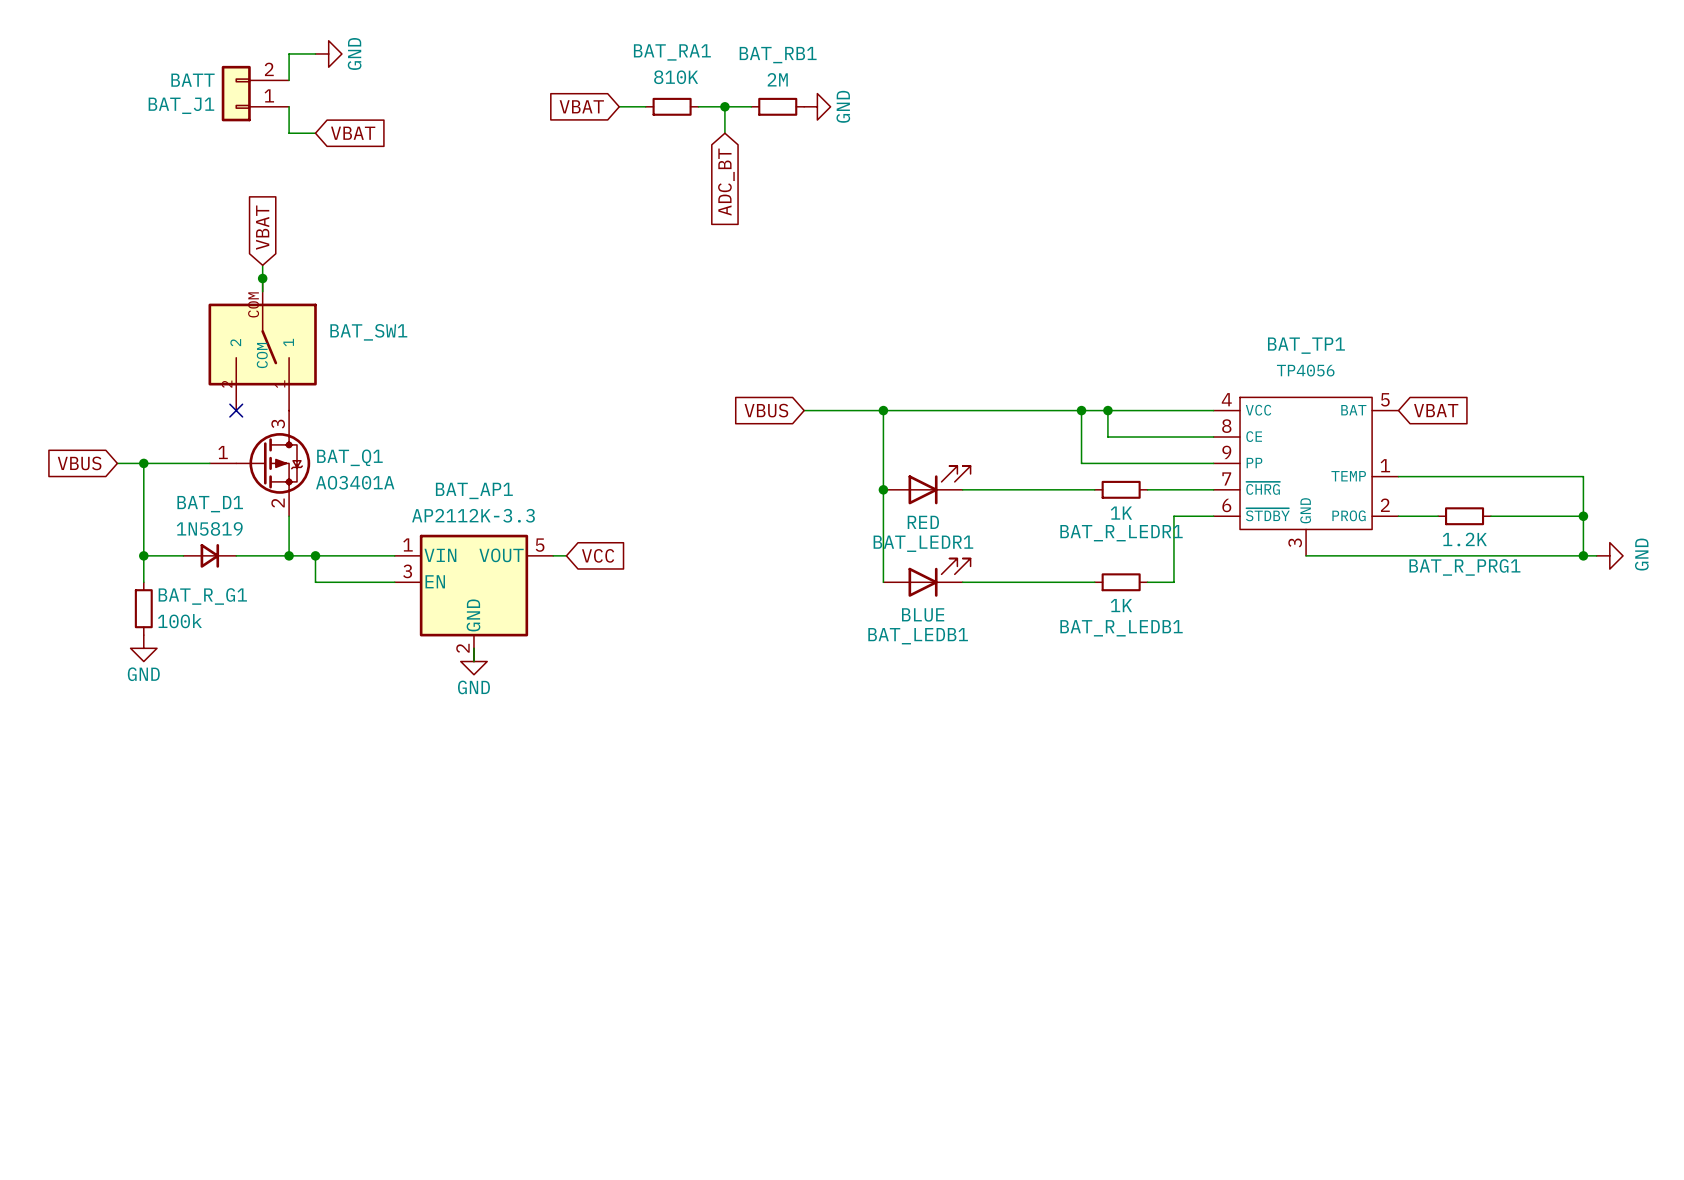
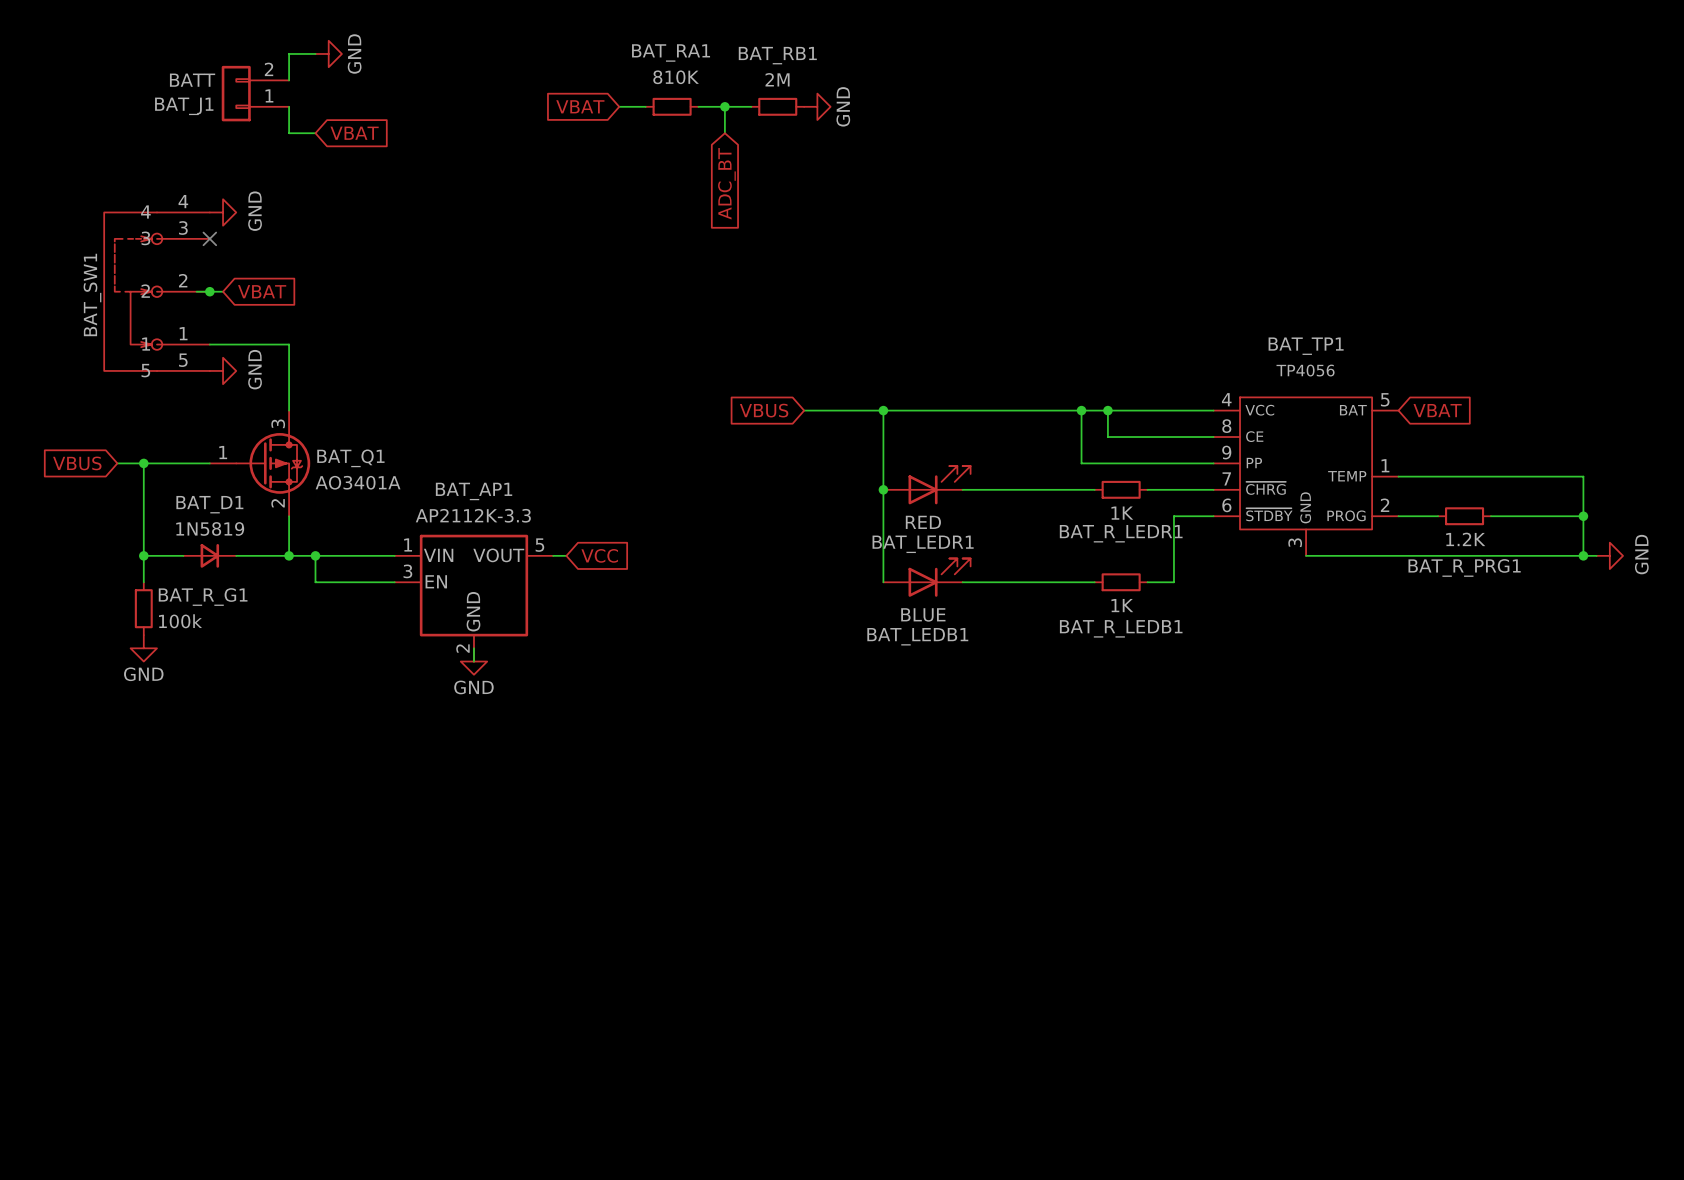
power symbol: none -> GND (223, 212)
global label rotation: 0° (262, 227) -> 90° clockwise (262, 291)
no-connect mark: none -> (209, 238)
wire: (262, 265) (262, 291) -> none
BAT_SW1 symbol: [208, 278, 317, 411] -> [104, 212, 210, 371]
junction position: (262, 278) -> (209, 291)
wire: none -> (196, 291) (223, 291)
BAT_SW1 name position: BAT_SW1 (368, 332) -> BAT_SW1 (92, 294)
power symbol: none -> GND (223, 370)
no-connect mark: (236, 410) -> none

